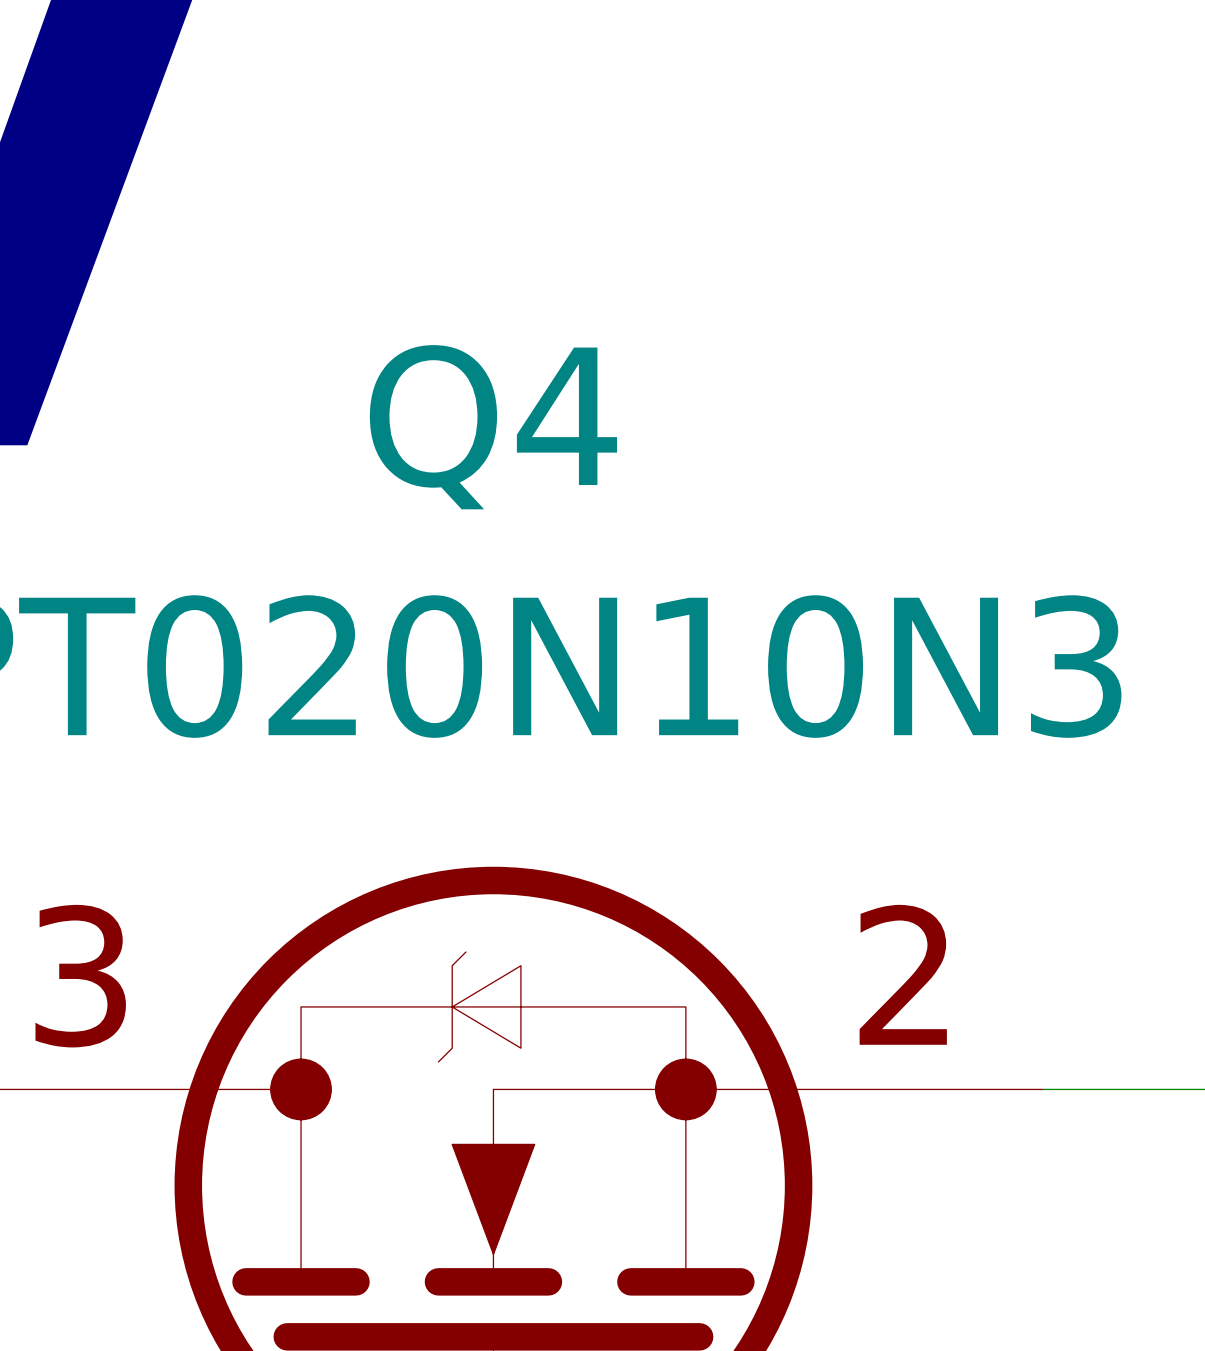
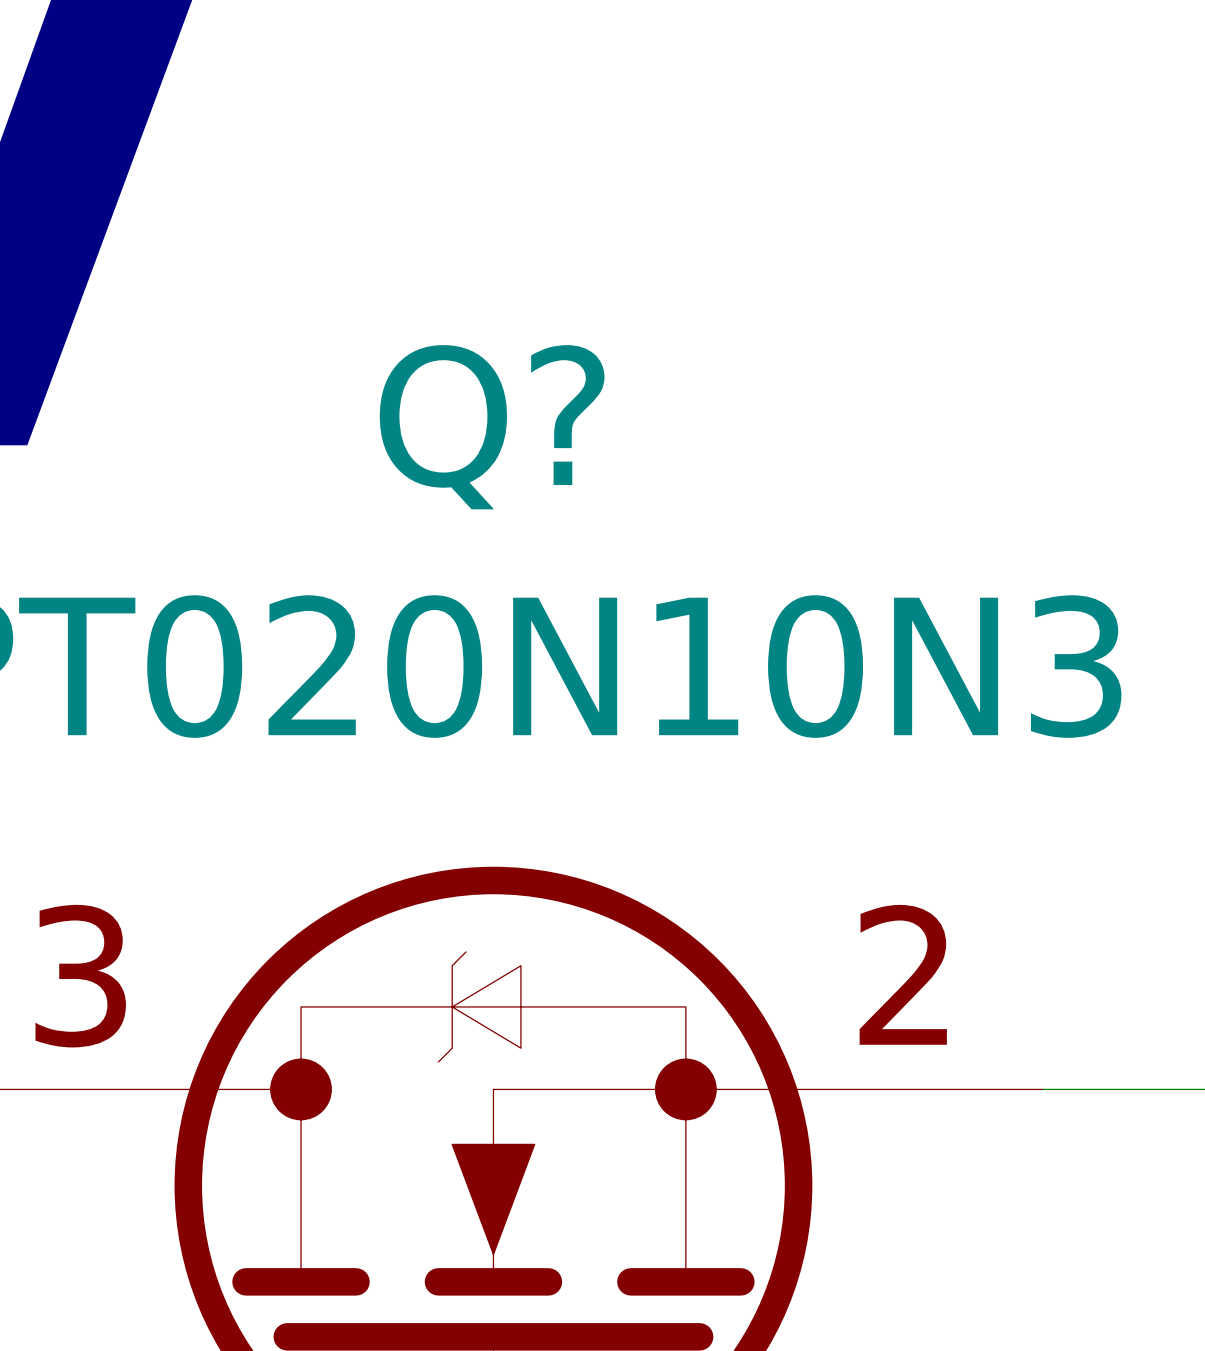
Q4 name: Q4 (493, 427) -> Q? (492, 427)

